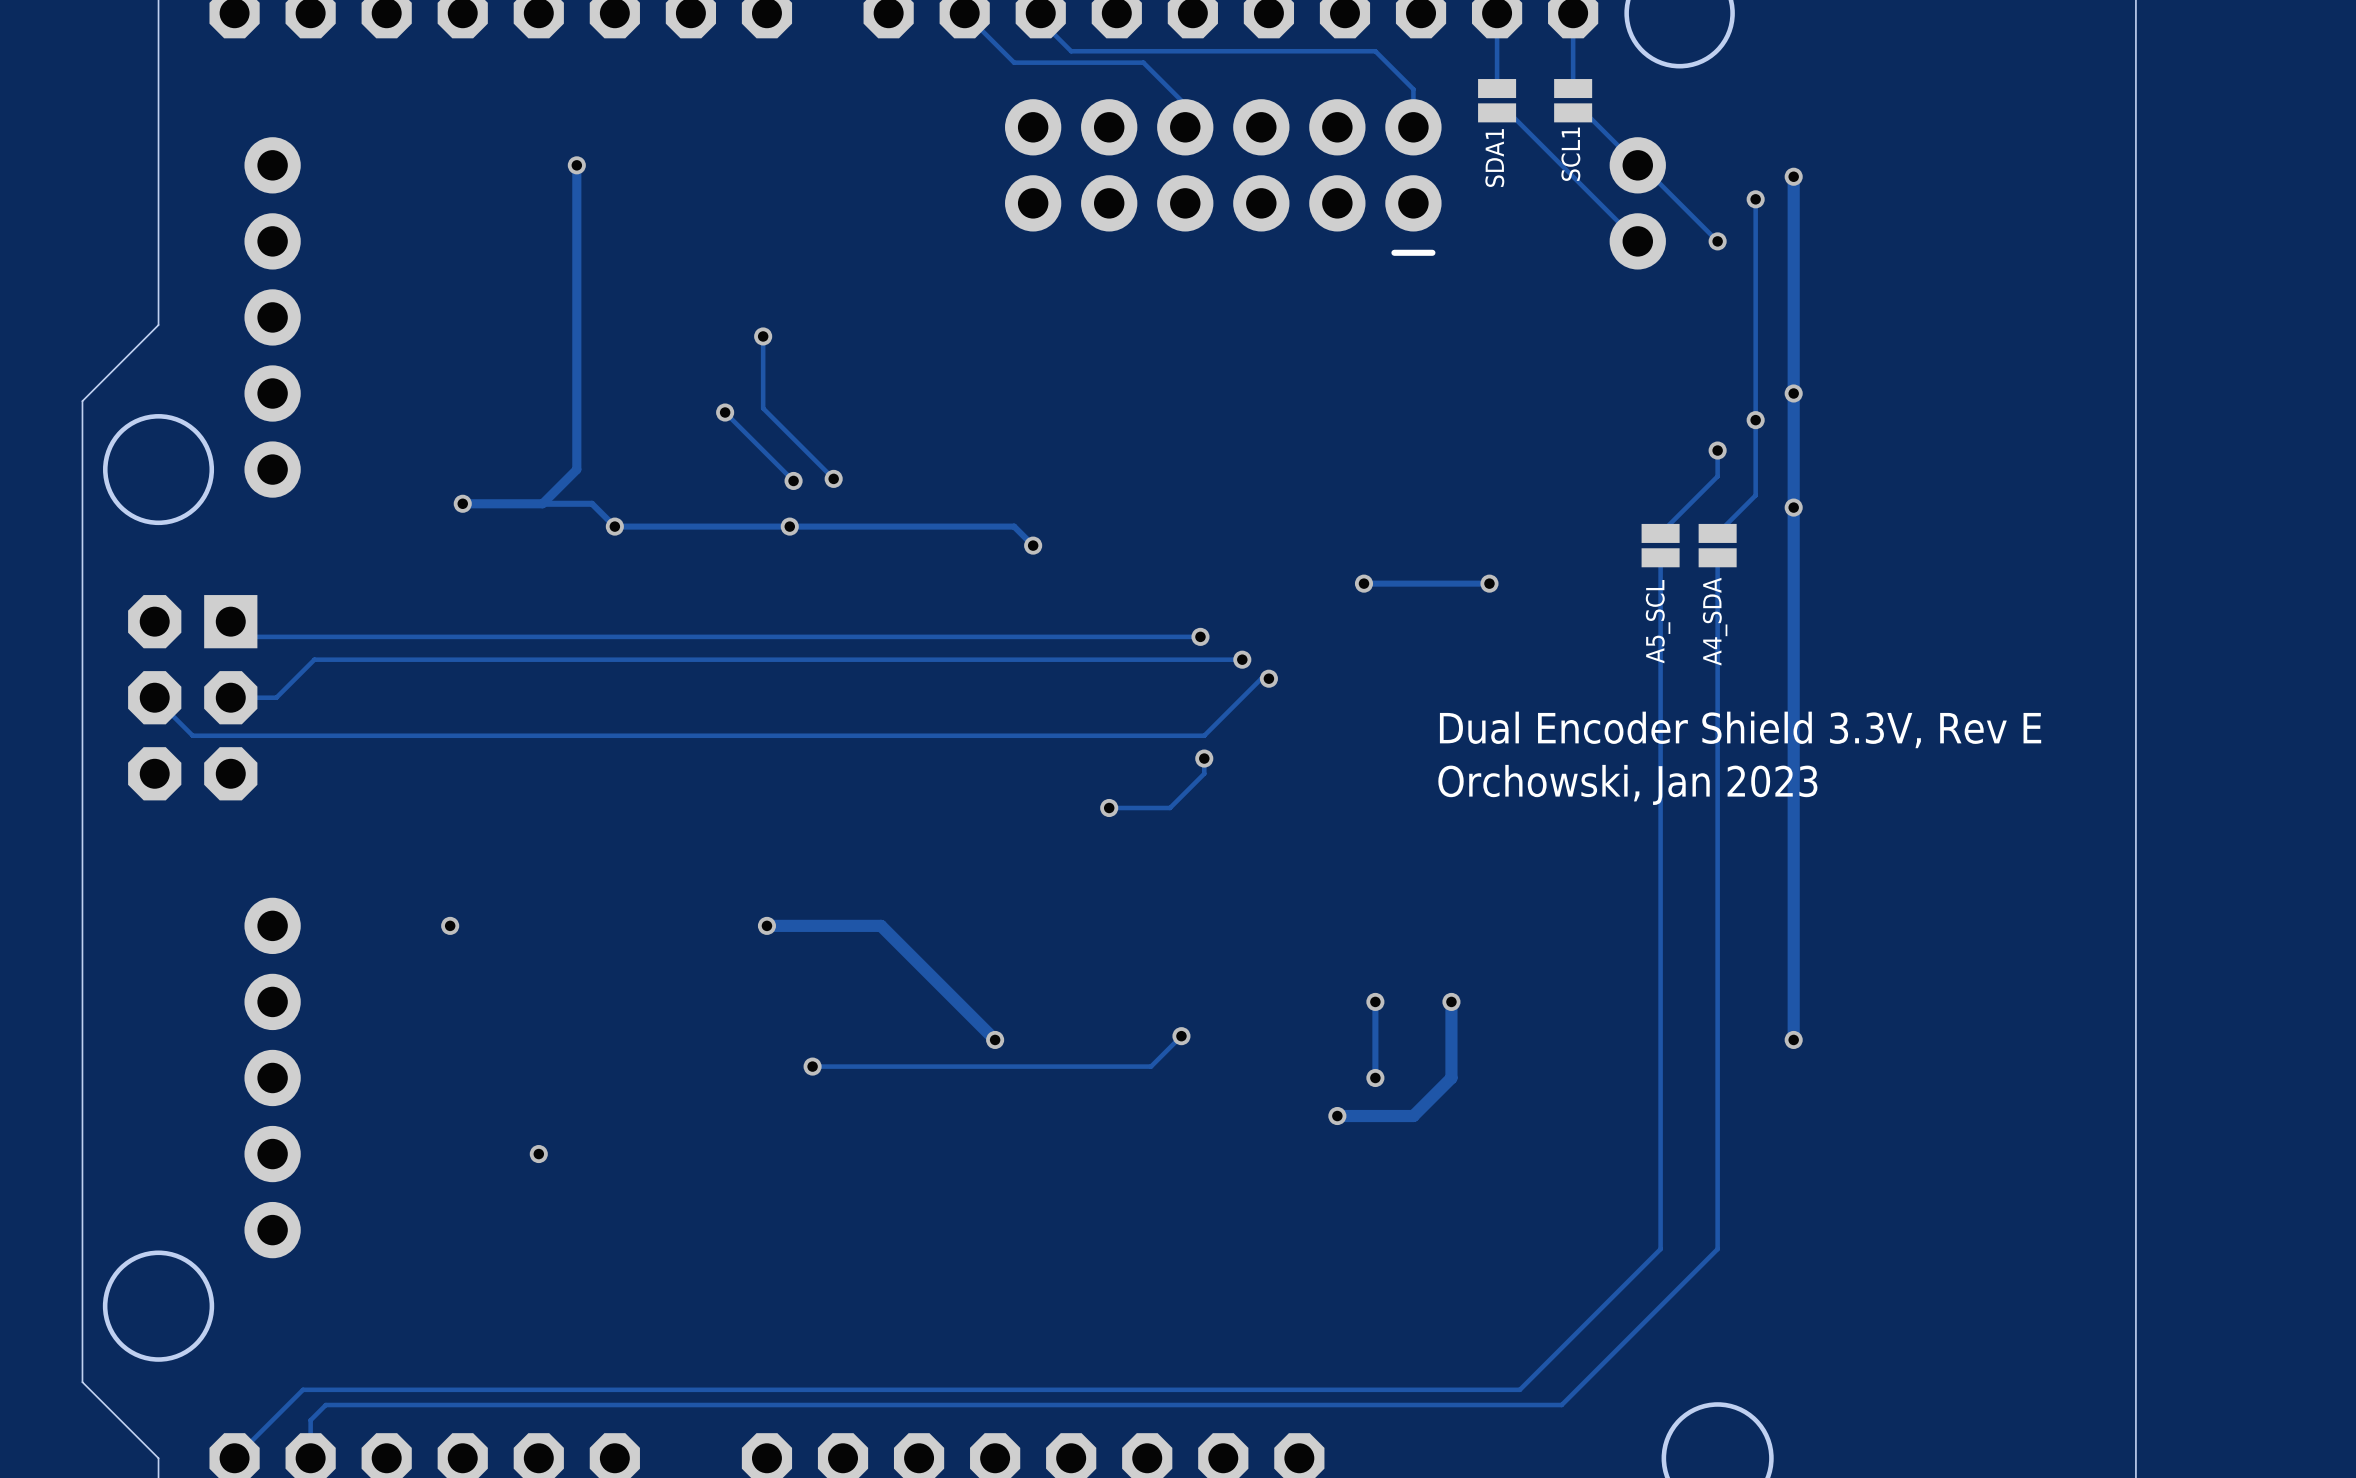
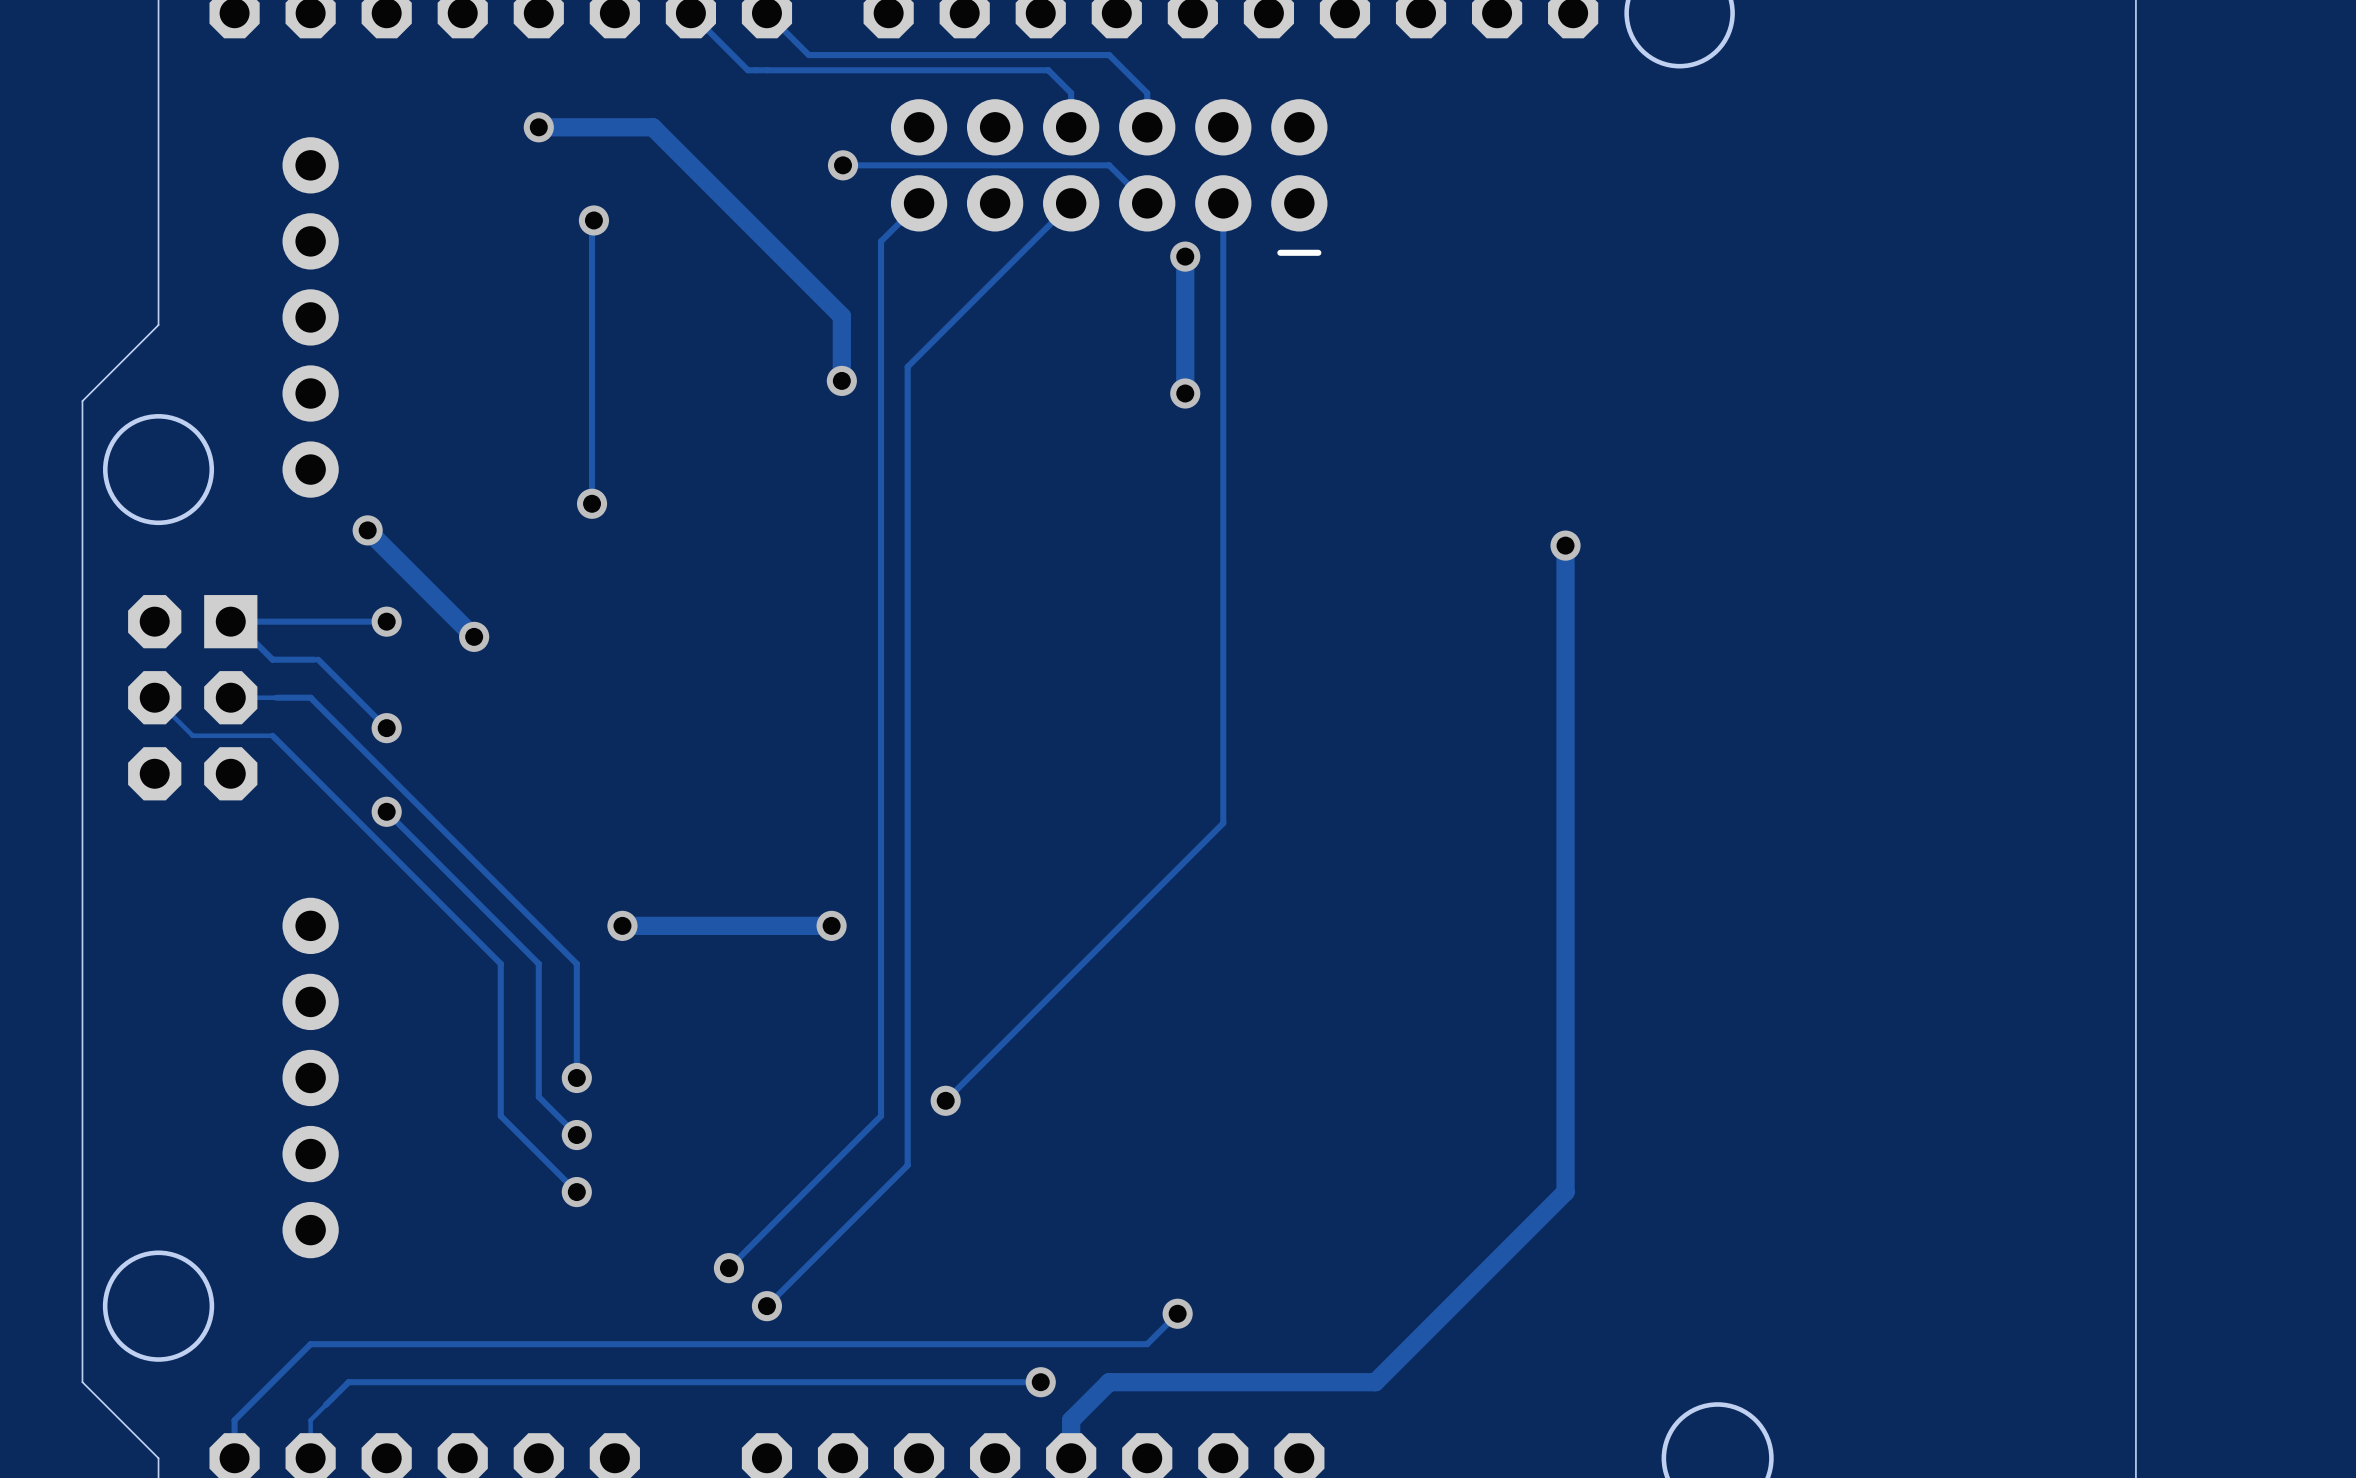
track: none -> (690, 13) (747, 70) (1048, 70) (1071, 93) (1071, 127)
track: none -> (766, 13) (808, 55) (1109, 55) (1147, 93) (1147, 127)
track: (964, 13) (1014, 62) (1143, 62) (1185, 104) (1185, 127) -> none
track: (1040, 13) (1040, 20) (1071, 51) (1375, 51) (1413, 89) (1413, 127) -> none
track: (1497, 13) (1497, 88) -> none
track: (1573, 13) (1573, 88) -> none
SDA1: (1497, 100) -> none
SCL1: (1573, 100) -> none
track: (1497, 112) (1509, 112) (1637, 241) -> none
track: (1573, 112) (1585, 112) (1637, 165) (1641, 165) (1717, 241) -> none
track: none -> (538, 127) (652, 127) (841, 316) (841, 380)
via: none -> (538, 127)
track: (576, 165) (576, 469) (542, 503) -> none
via: (576, 165) -> none
track: none -> (843, 165) (1109, 165) (1147, 203)
via: none -> (843, 165)
track: (1793, 176) (1793, 1039) -> none
via: (1793, 176) -> none
part position: (1223, 177) -> (1109, 177)
track: (1755, 199) (1755, 495) (1717, 533) -> none
via: (1755, 199) -> none
track: none -> (919, 203) (881, 241) (881, 1116) (728, 1268)
track: none -> (1071, 203) (907, 366) (907, 1165) (766, 1306)
track: none -> (1223, 203) (1223, 823) (945, 1100)
part: (1637, 203) -> none
track: none -> (593, 220) (592, 222) (592, 503)
via: none -> (593, 220)
via: (1717, 241) -> none
track: none -> (1185, 256) (1185, 393)
via: none -> (1185, 256)
part position: (272, 317) -> (310, 317)
track: (763, 336) (763, 408) (833, 478) -> none
via: (763, 336) -> none
via: none -> (841, 380)
via: none -> (1185, 393)
via: (1793, 393) -> none
track: (725, 412) (793, 480) -> none
via: (725, 412) -> none
via: (1755, 420) -> none
track: (1717, 450) (1717, 476) (1660, 533) -> none
via: (1717, 450) -> none
via: (833, 478) -> none
via: (793, 480) -> none
via: (462, 503) -> none
track: (542, 503) (462, 503) -> none
track: (542, 503) (592, 503) (614, 526) (1014, 526) (1033, 545) -> none
via: none -> (592, 503)
via: (1793, 507) -> none
via: (614, 526) -> none
via: (789, 526) -> none
track: none -> (367, 530) (474, 636)
via: none -> (367, 530)
via: (1033, 545) -> none
track: none -> (1565, 545) (1565, 1192) (1375, 1382) (1109, 1382) (1071, 1420) (1071, 1458)
via: none -> (1565, 545)
A5_SCL: (1660, 545) -> none
A4_SDA: (1717, 545) -> none
track: (1660, 557) (1660, 1249) (1519, 1389) (303, 1389) (234, 1458) -> (1177, 1313) (1147, 1344) (310, 1344) (234, 1420) (234, 1458)
track: (1717, 557) (1717, 1249) (1561, 1405) (325, 1405) -> (1040, 1382) (348, 1382) (325, 1405)
via: (1363, 583) -> none
track: (1489, 583) (1363, 583) -> none
via: (1489, 583) -> none
track: (230, 621) (245, 636) (1200, 636) -> (230, 621) (386, 621)
via: none -> (386, 621)
via: none -> (474, 636)
via: (1200, 636) -> none
track: (314, 659) (276, 697) -> (314, 659) (272, 659) (234, 621)
track: (1242, 659) (318, 659) -> (386, 728) (318, 659)
via: (1242, 659) -> none
track: (1268, 678) (1261, 678) (1204, 735) (272, 735) -> (576, 1192) (500, 1116) (500, 963) (272, 735)
via: (1268, 678) -> none
track: none -> (276, 697) (310, 697) (576, 963) (576, 1077)
via: none -> (386, 728)
text: Dual Encoder Shield 3.3V, Rev E (1740, 729) -> none
track: (1204, 758) (1204, 773) (1170, 807) (1109, 807) -> none
via: (1204, 758) -> none
text: Orchowski, Jan 2023 (1627, 784) -> none
via: (1109, 807) -> none
track: none -> (386, 811) (538, 963) (538, 1097) (576, 1135)
via: none -> (386, 811)
via: (450, 925) -> none
via: none -> (622, 925)
track: none -> (766, 925) (622, 925)
via: (766, 925) -> none
track: (831, 925) (881, 925) (995, 1039) -> none
track width: thin (831, 925) (766, 925) -> thick (831, 925) (766, 925)
via: none -> (831, 925)
track: (1375, 1001) (1375, 1077) -> none
via: (1375, 1001) -> none
track: (1451, 1001) (1451, 1077) (1413, 1116) (1337, 1116) -> none
via: (1451, 1001) -> none
track: (1181, 1036) (1151, 1066) (812, 1066) -> none
via: (1181, 1036) -> none
via: (995, 1039) -> none
via: (1793, 1039) -> none
via: (812, 1066) -> none
part position: (272, 1077) -> (310, 1077)
via: none -> (576, 1077)
via: (1375, 1077) -> none
via: none -> (945, 1100)
via: (1337, 1116) -> none
via: none -> (576, 1135)
via: (538, 1154) -> none
via: none -> (576, 1192)
via: none -> (728, 1268)
via: none -> (766, 1306)
via: none -> (1177, 1313)
via: none -> (1040, 1382)

